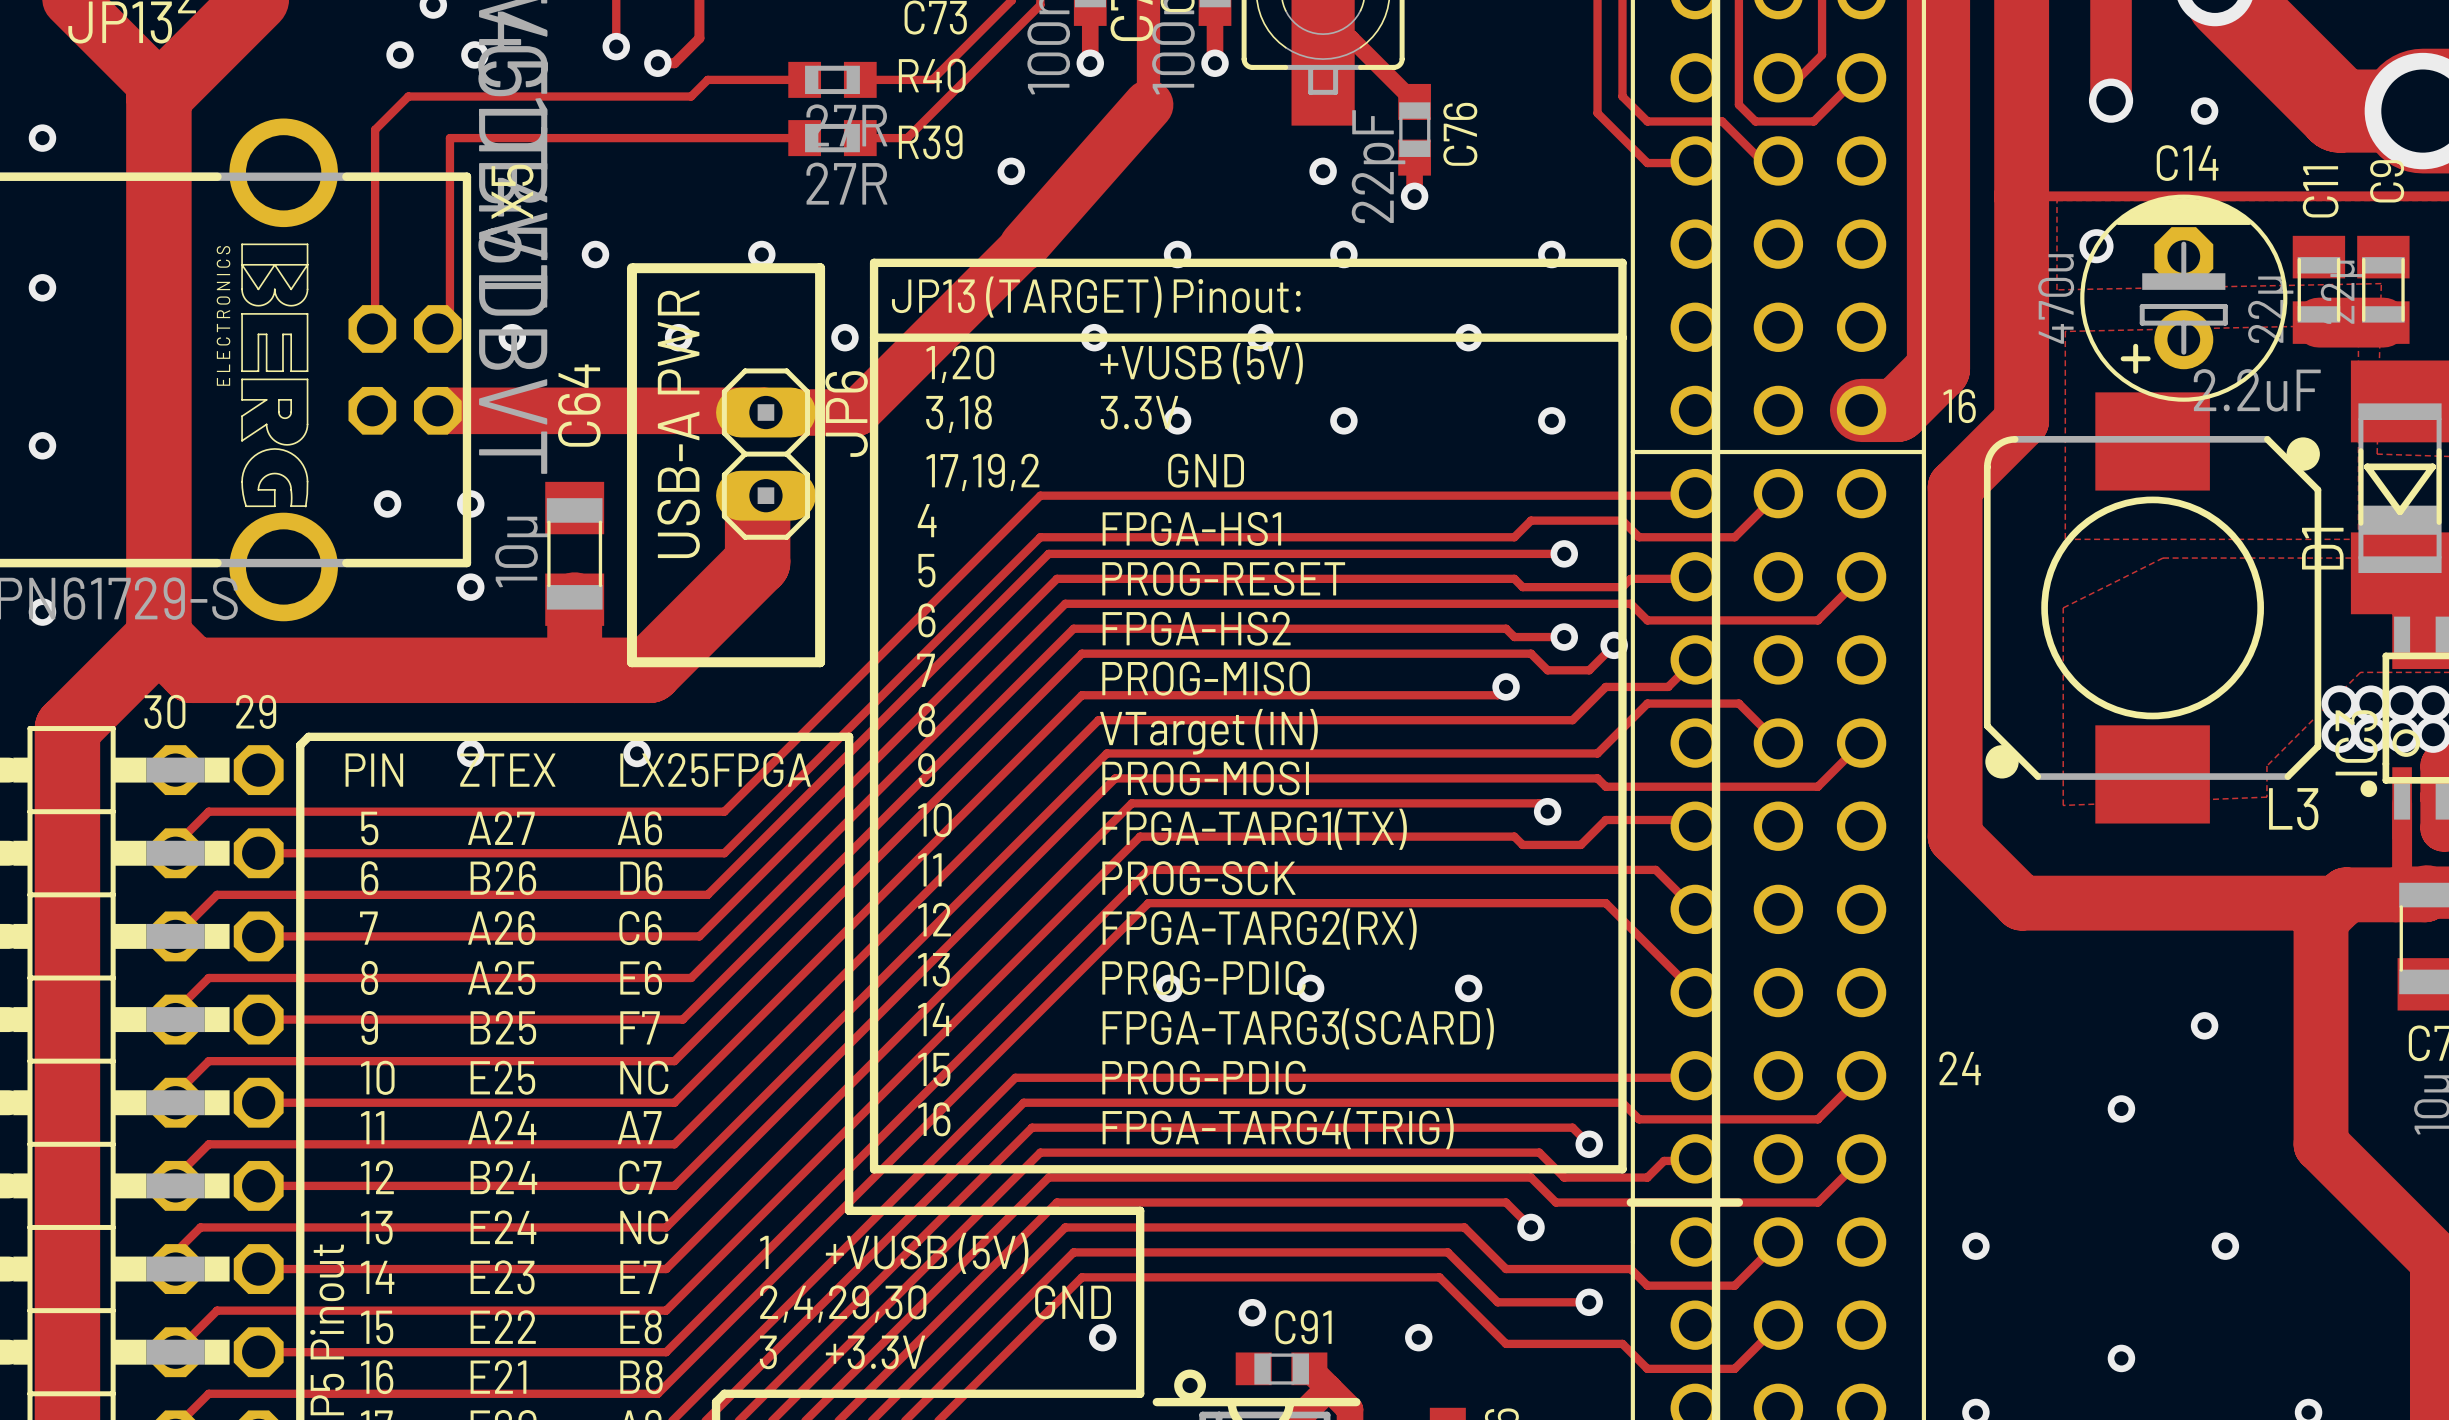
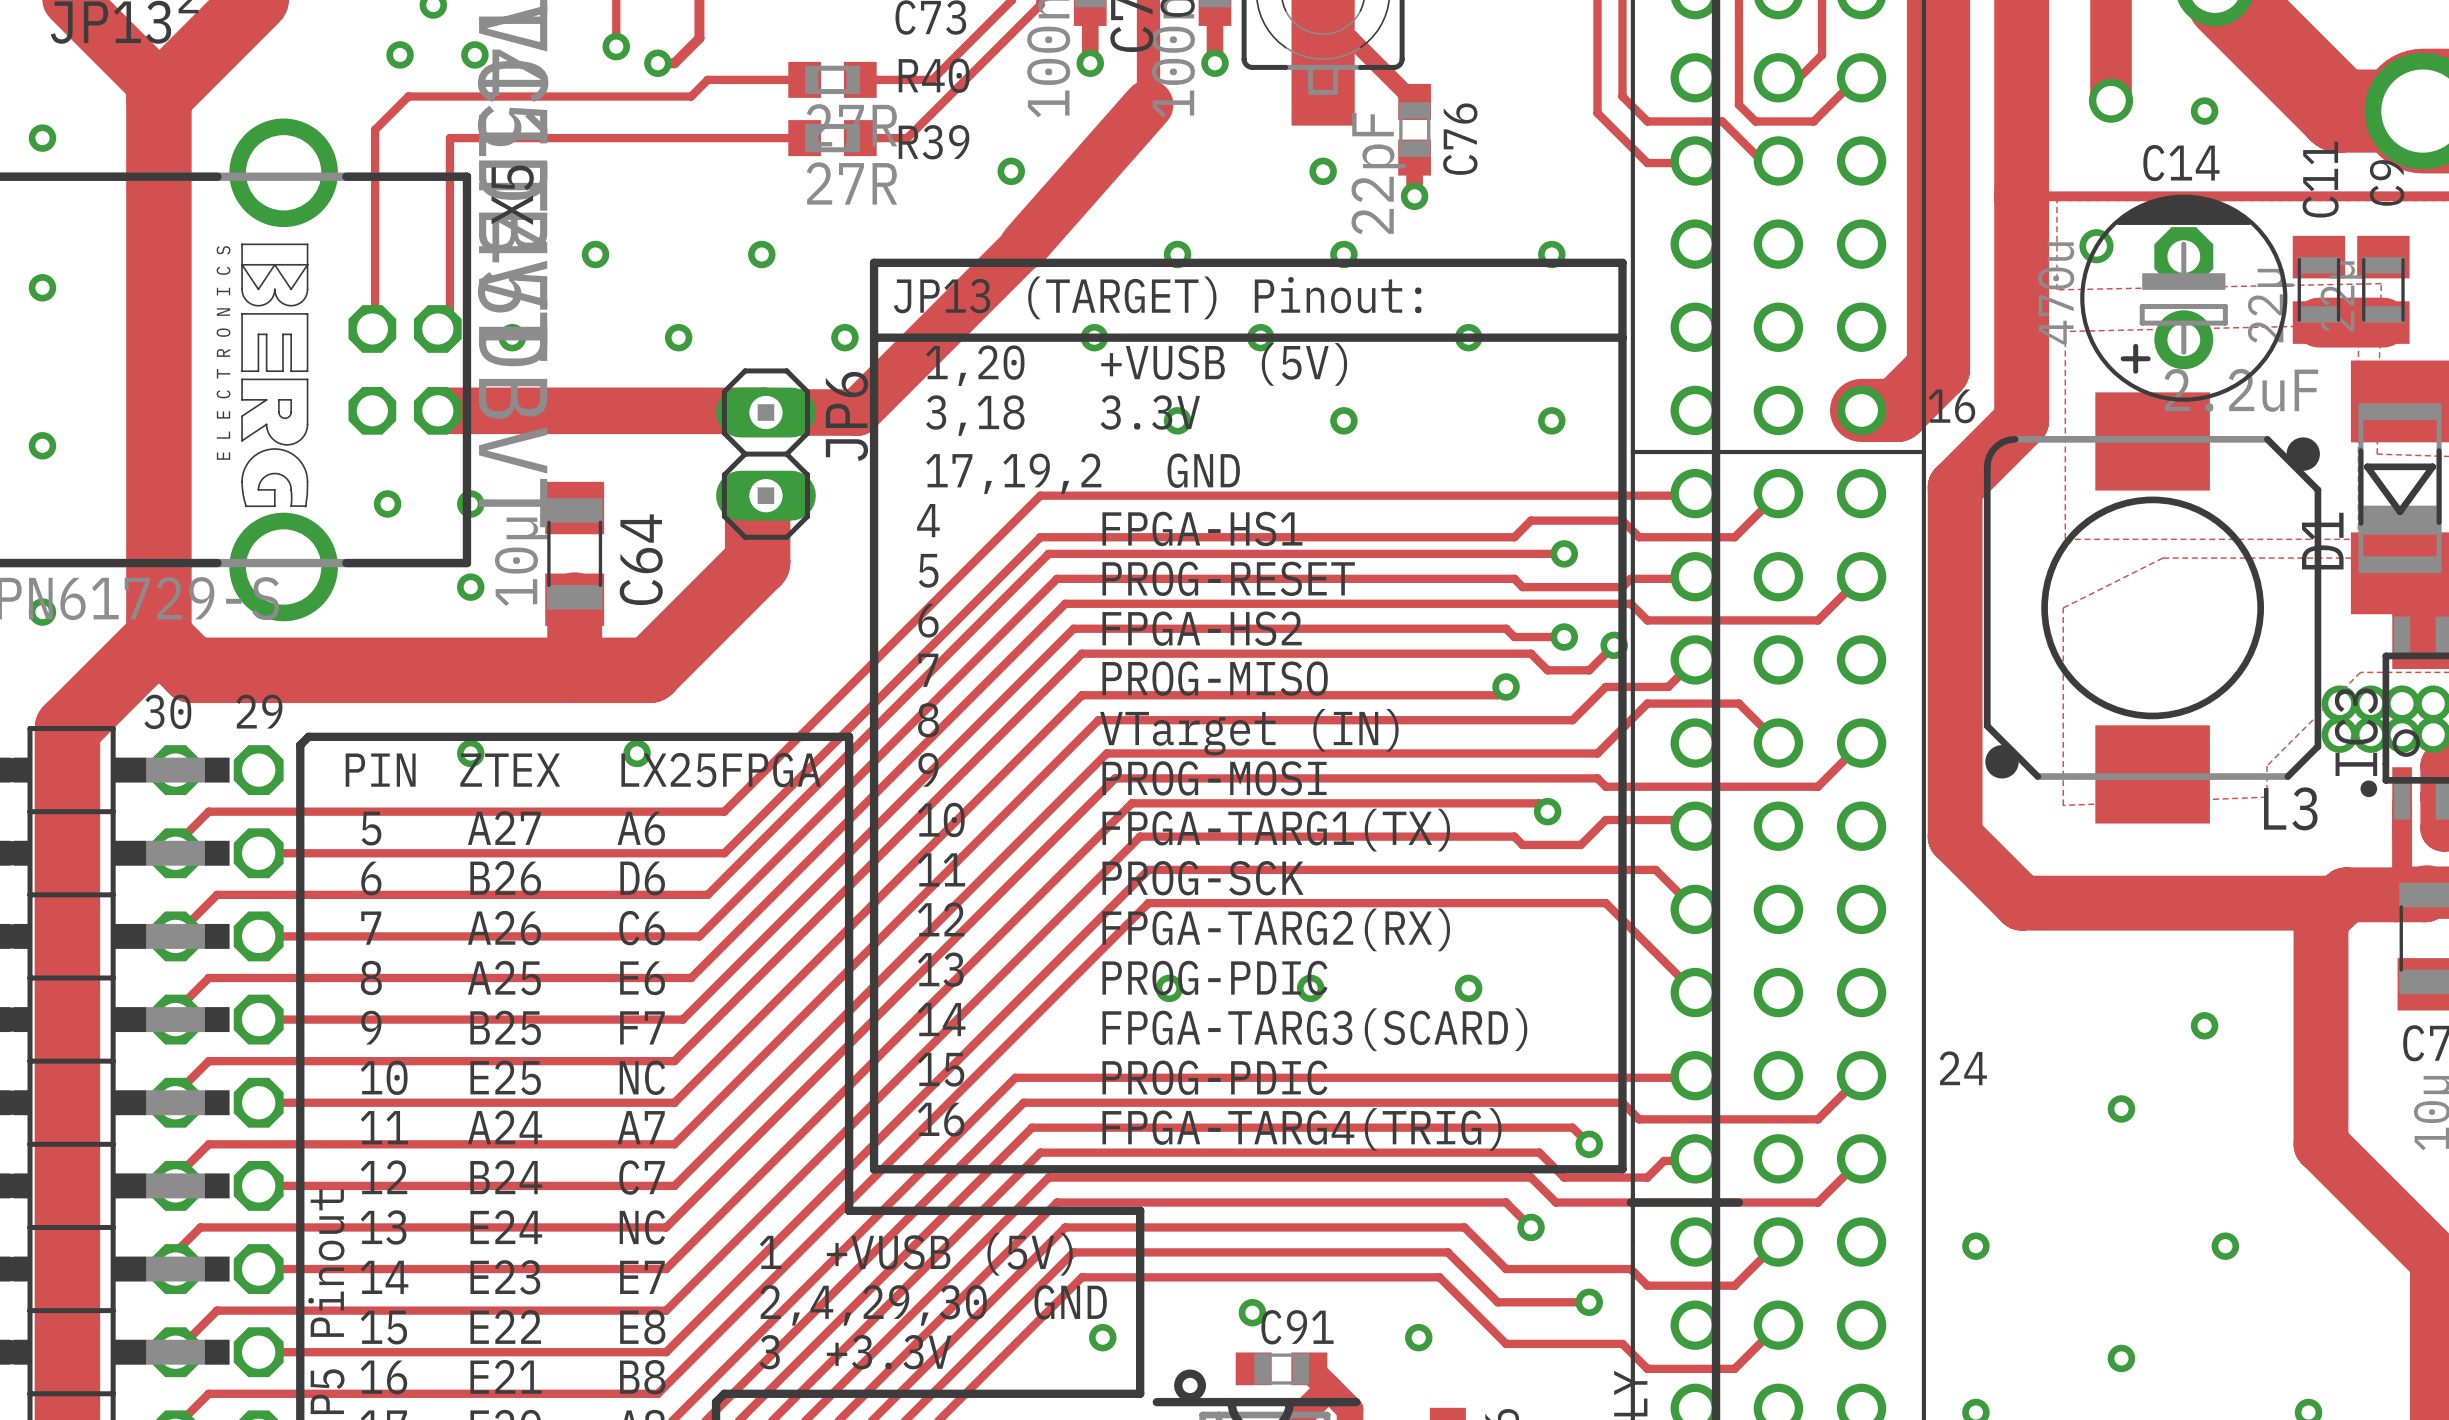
line: (631, 268) (631, 662) (820, 662) (820, 268) (634, 268) -> none
C64 name position: C64 (579, 405) -> C64 (641, 559)
text: USB-A PWR (678, 424) -> none

